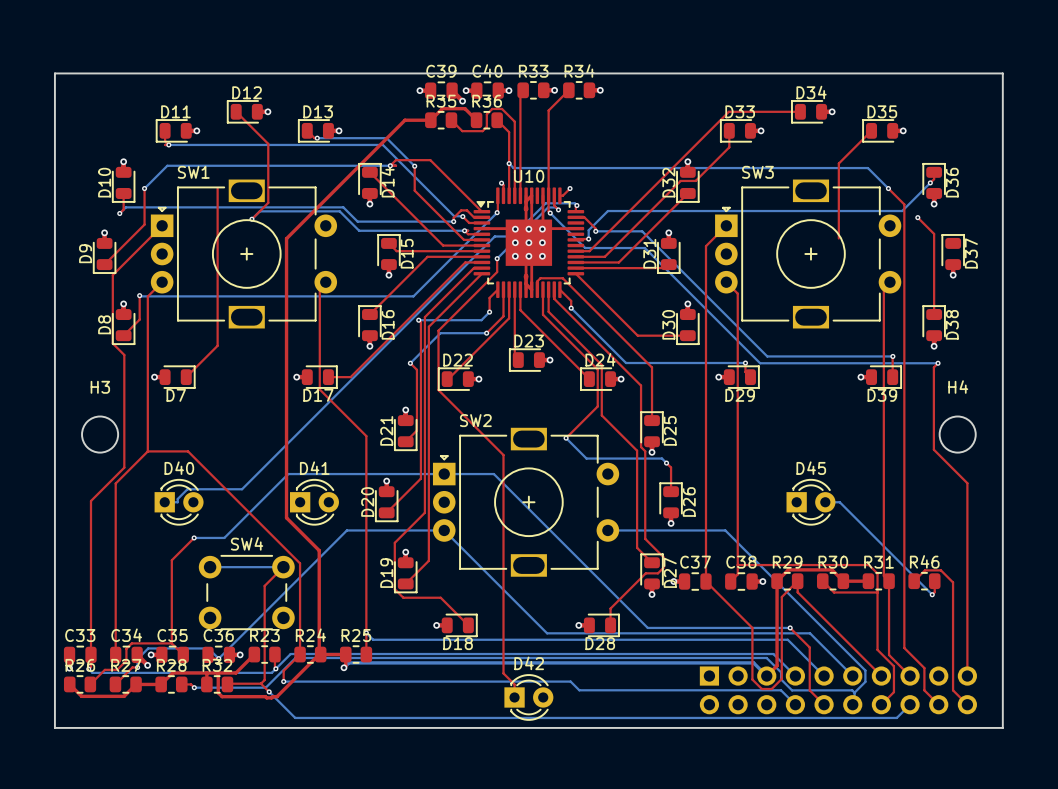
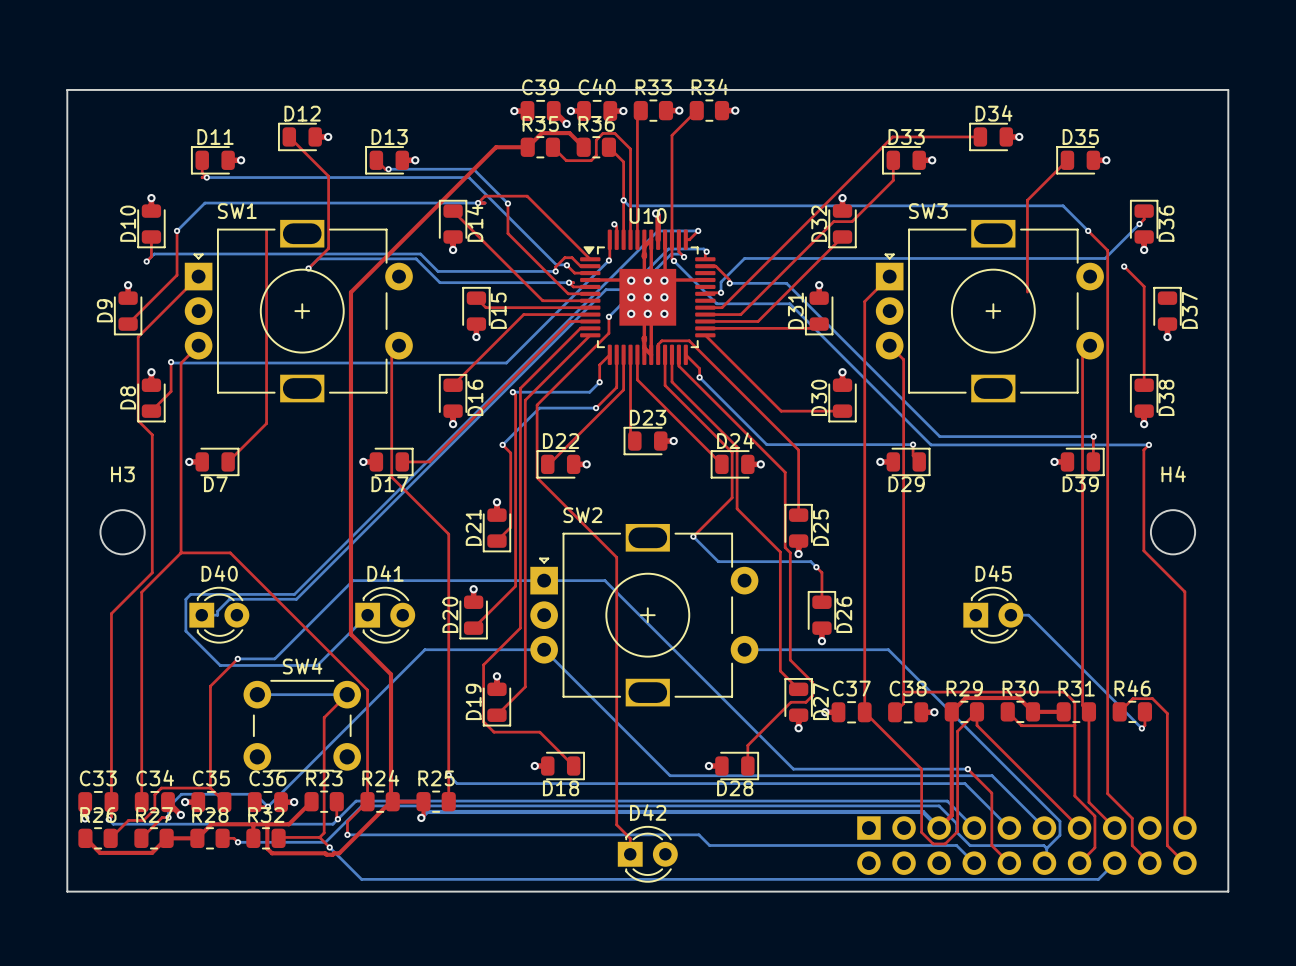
top track: none -> (656, 213) (658, 215) (658, 239)
via: none -> (656, 213)
bottom track: none -> (698, 230) (657, 230) (294, 594) (190, 594) (185, 599) (185, 631) (220, 665) (317, 665) (367, 615)

